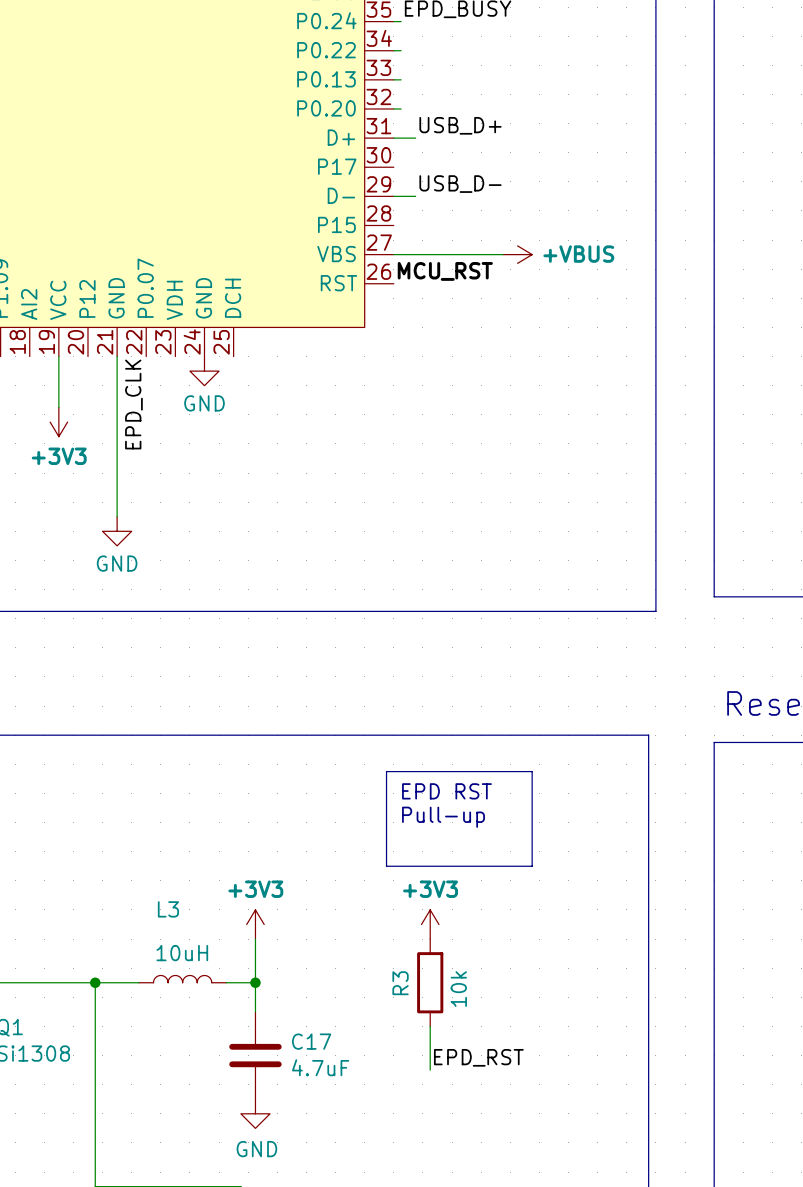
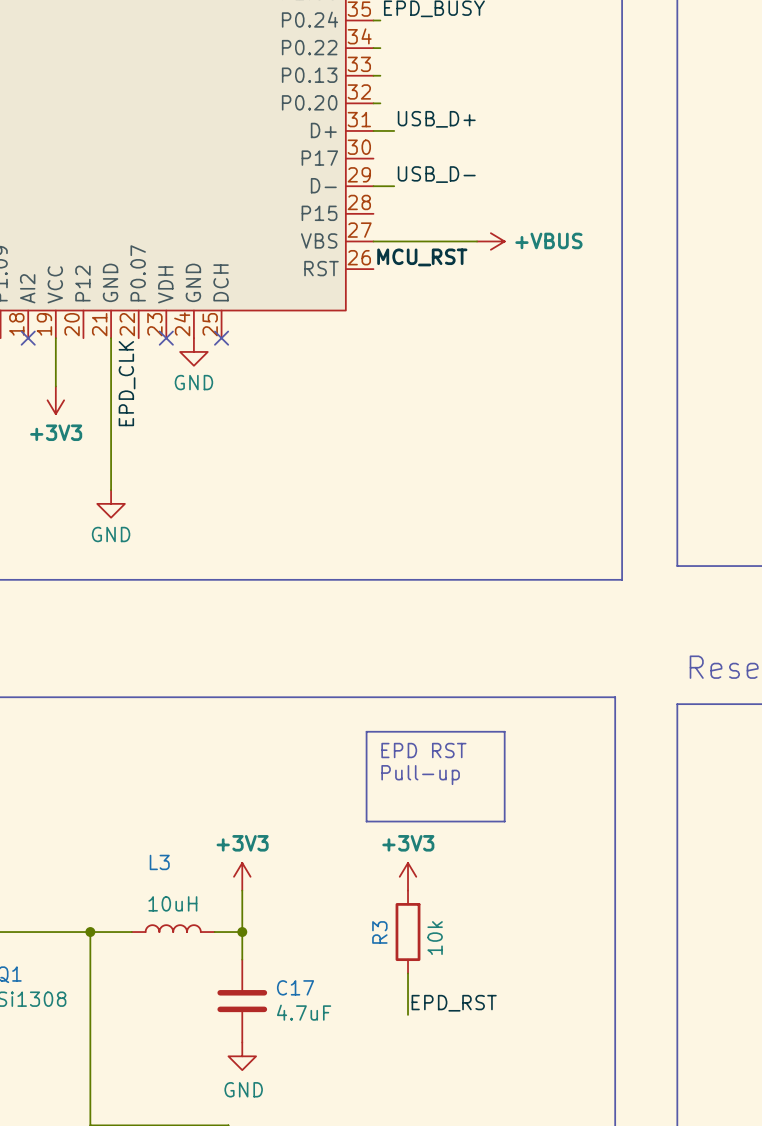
no-connect mark: none -> (28, 338)
no-connect mark: none -> (166, 338)
no-connect mark: none -> (221, 338)

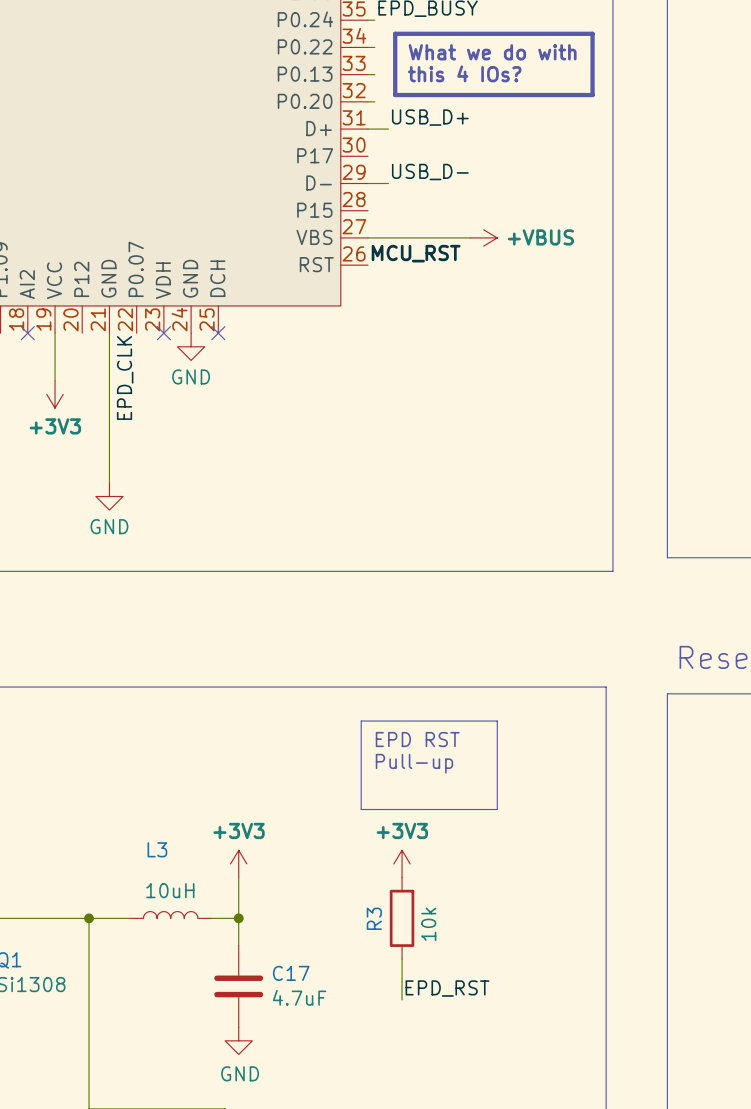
line: none -> (395, 33) (592, 33) (592, 95) (395, 95) (395, 33)
text: none -> What we do with (492, 52)
text: none -> this 4 IOs? (464, 73)

